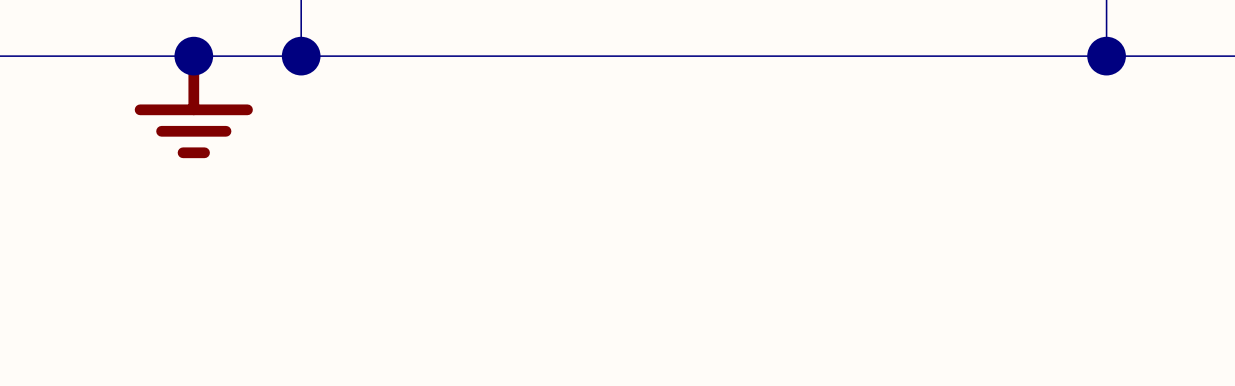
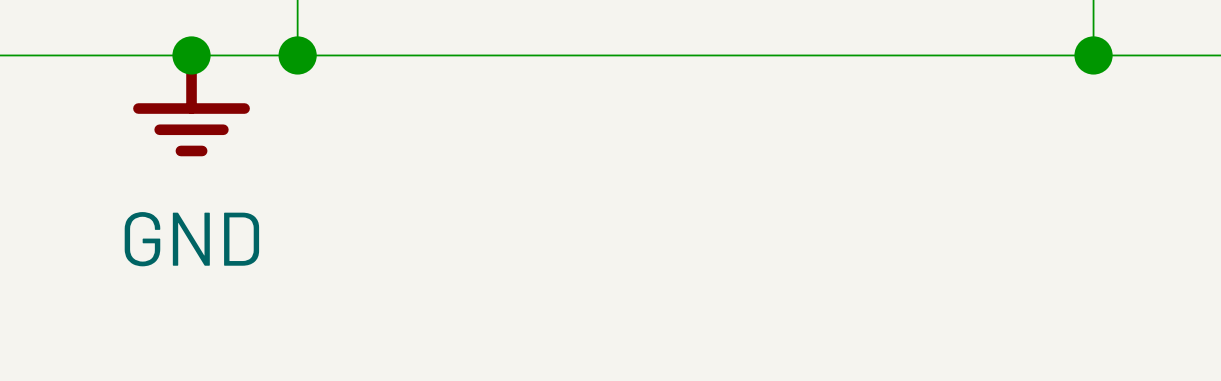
power symbol text: none -> GND (191, 239)

